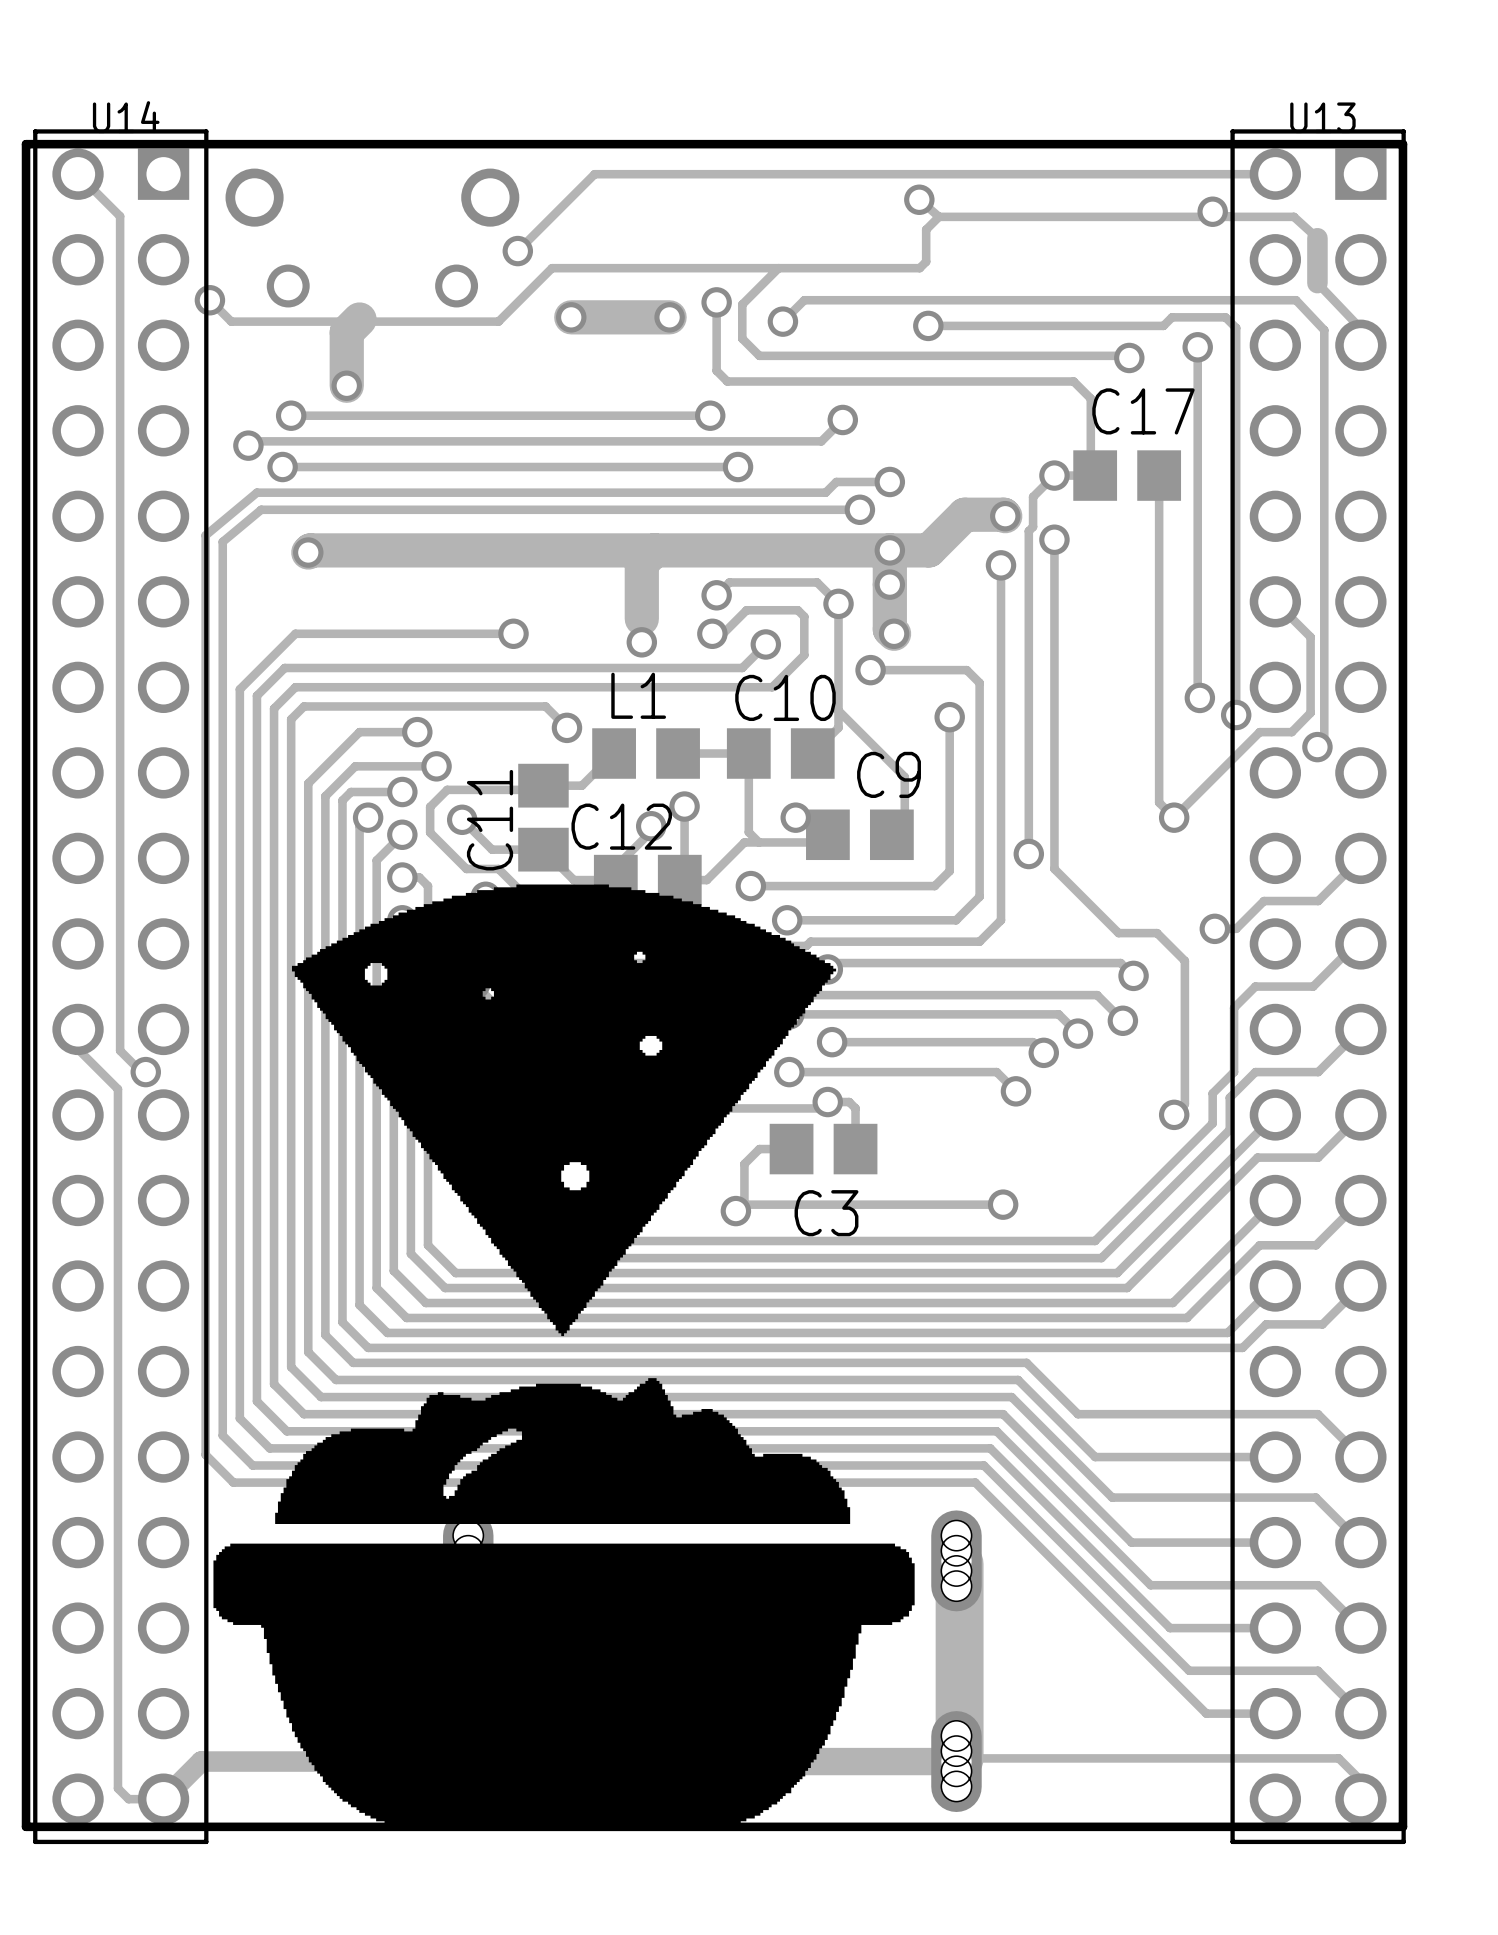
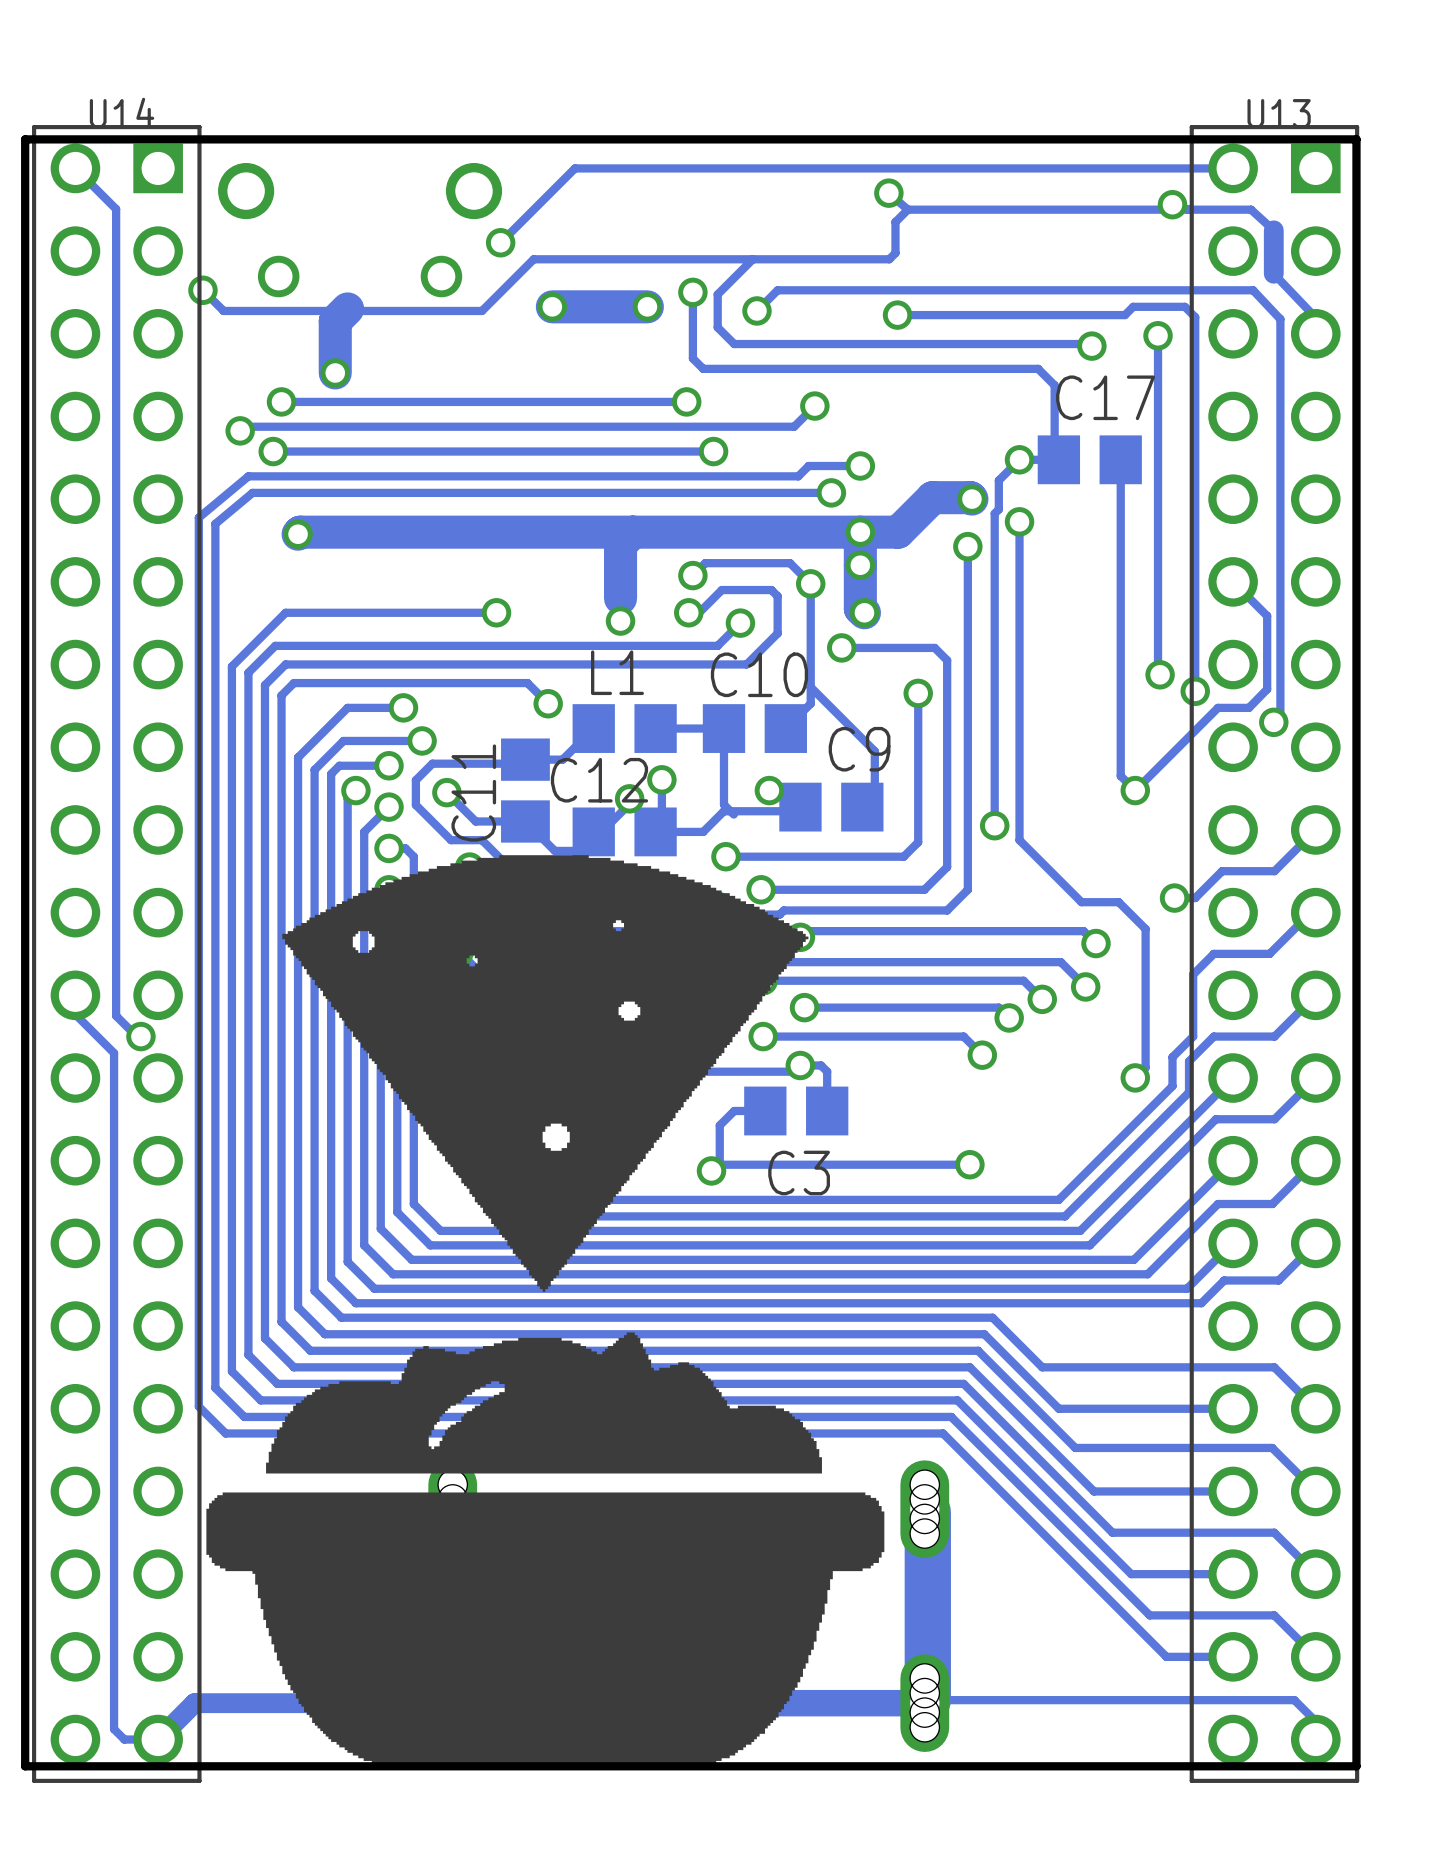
track: (823, 839) (820, 842) (744, 842) (706, 880) (679, 880) (681, 863) -> (796, 811) (723, 811) (703, 831) (655, 831) (661, 817)
C12 position: (647, 880) -> (624, 831)

